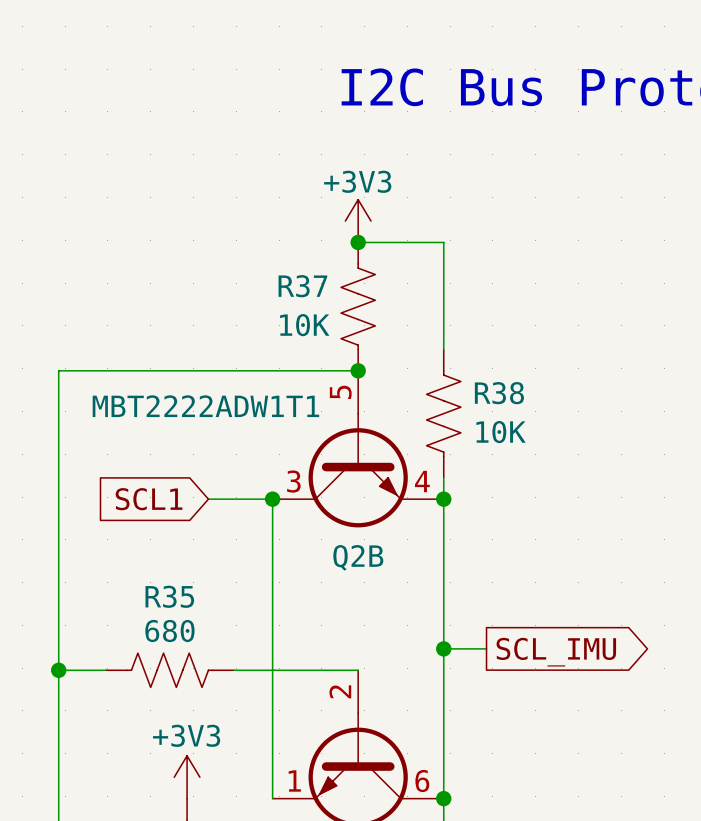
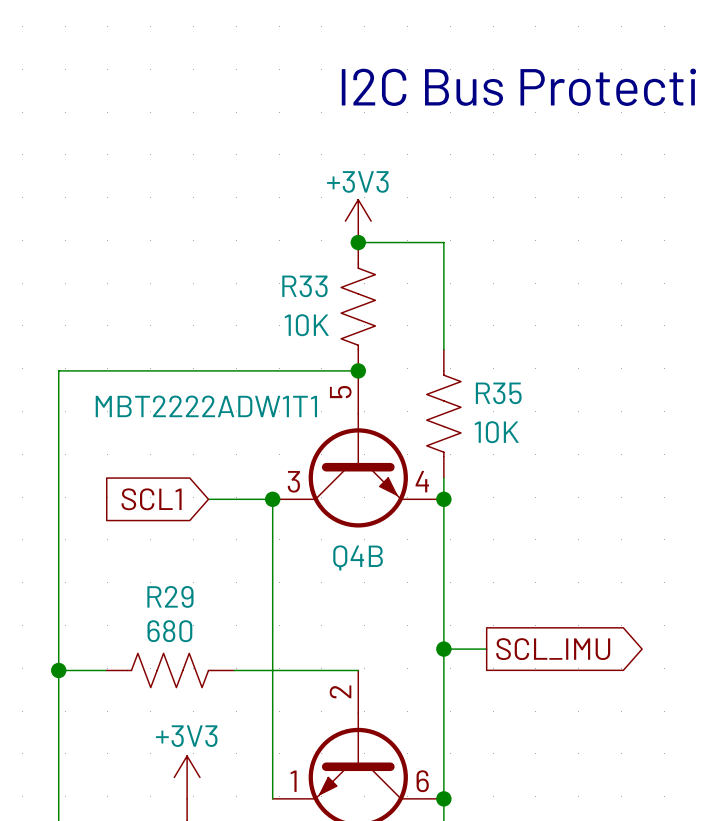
R37 name: R37 (302, 286) -> R33 (304, 286)
R38 name: R38 (499, 393) -> R35 (498, 393)
Q2B name: Q2B (358, 557) -> Q4B (358, 557)
R35 name: R35 (169, 596) -> R29 (170, 596)

